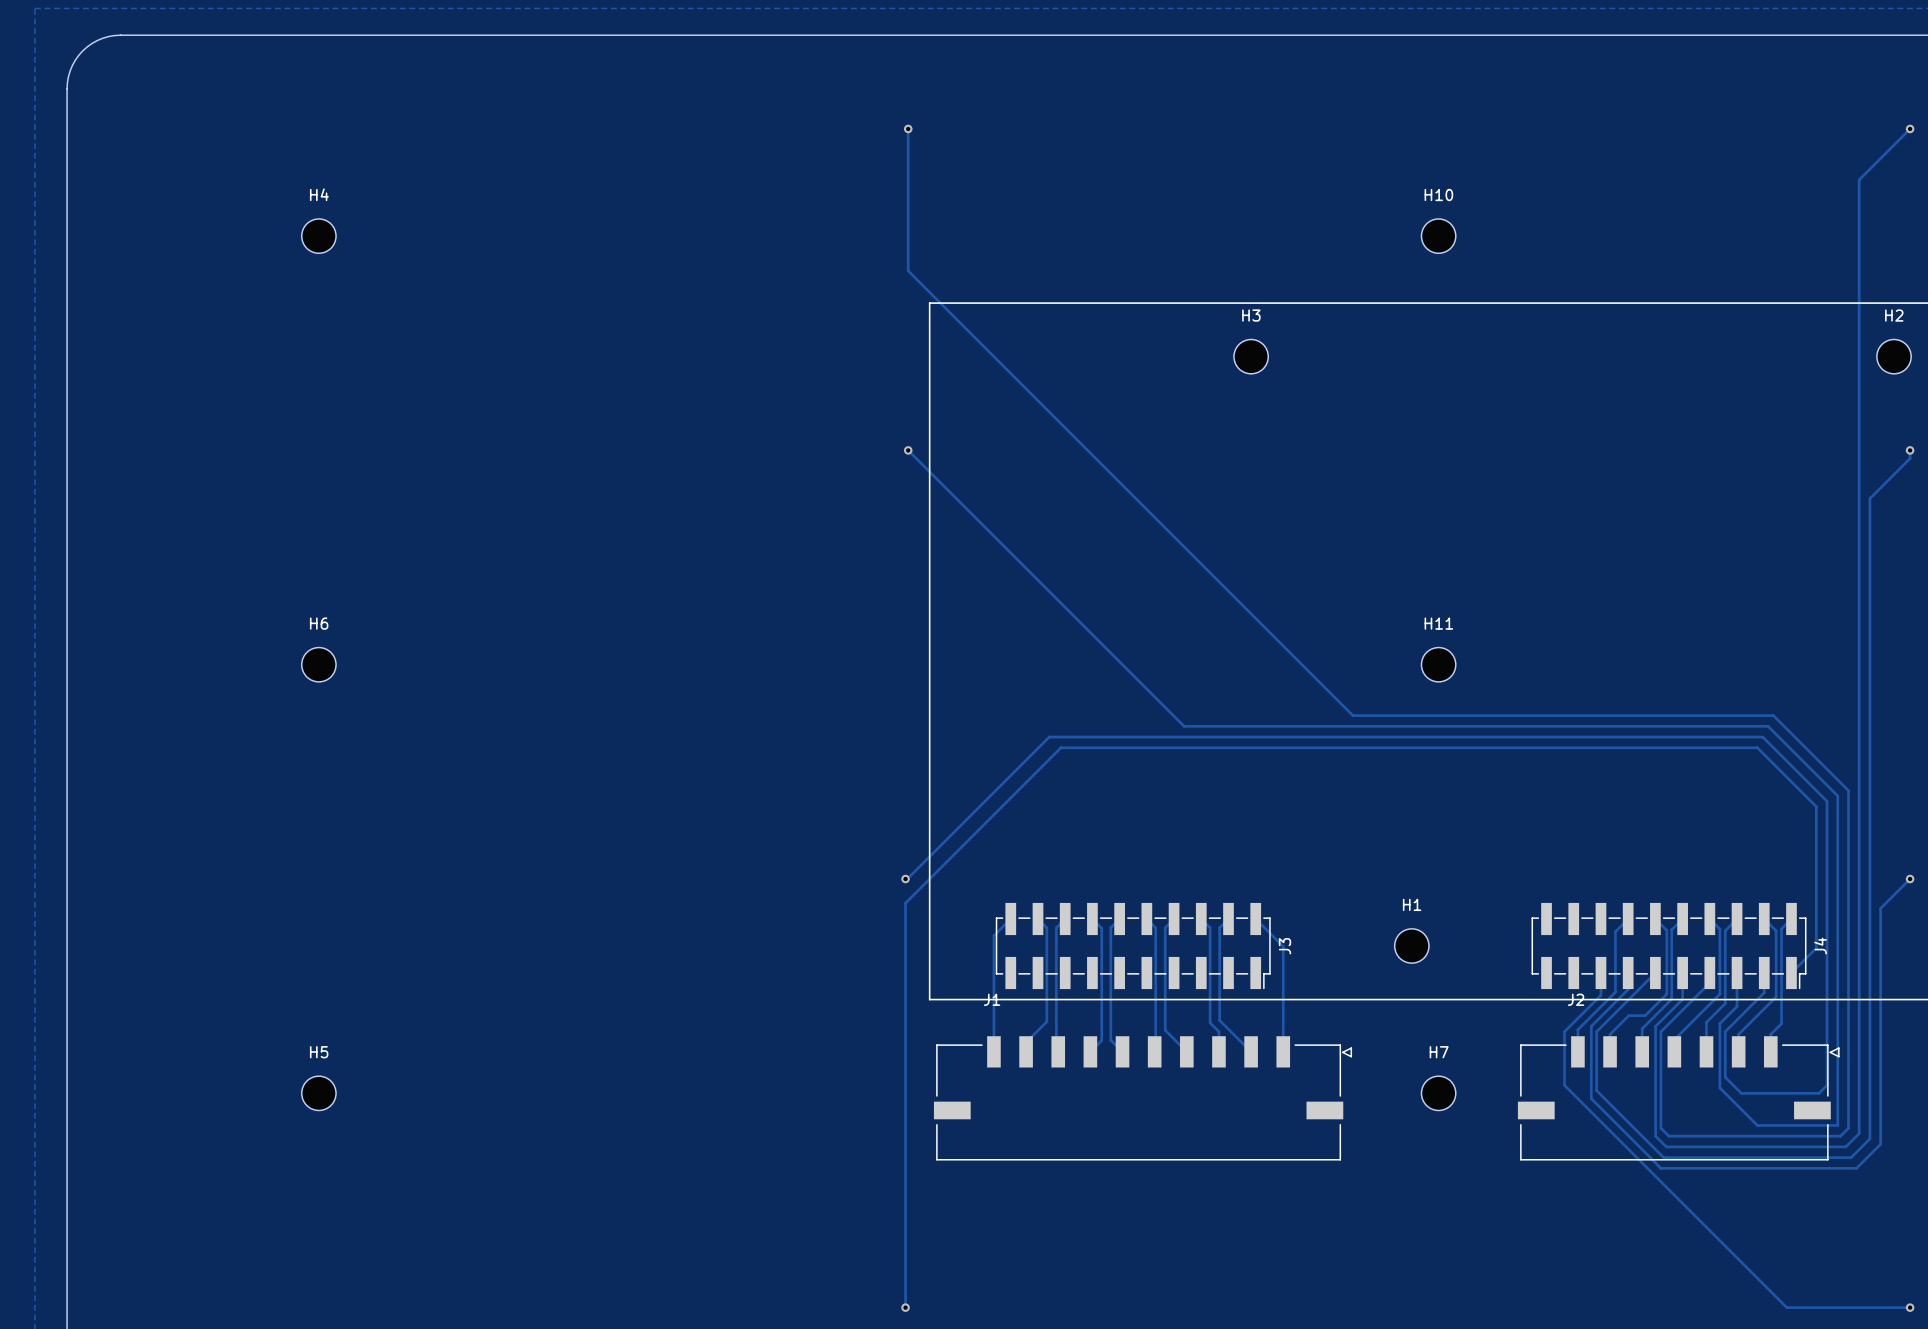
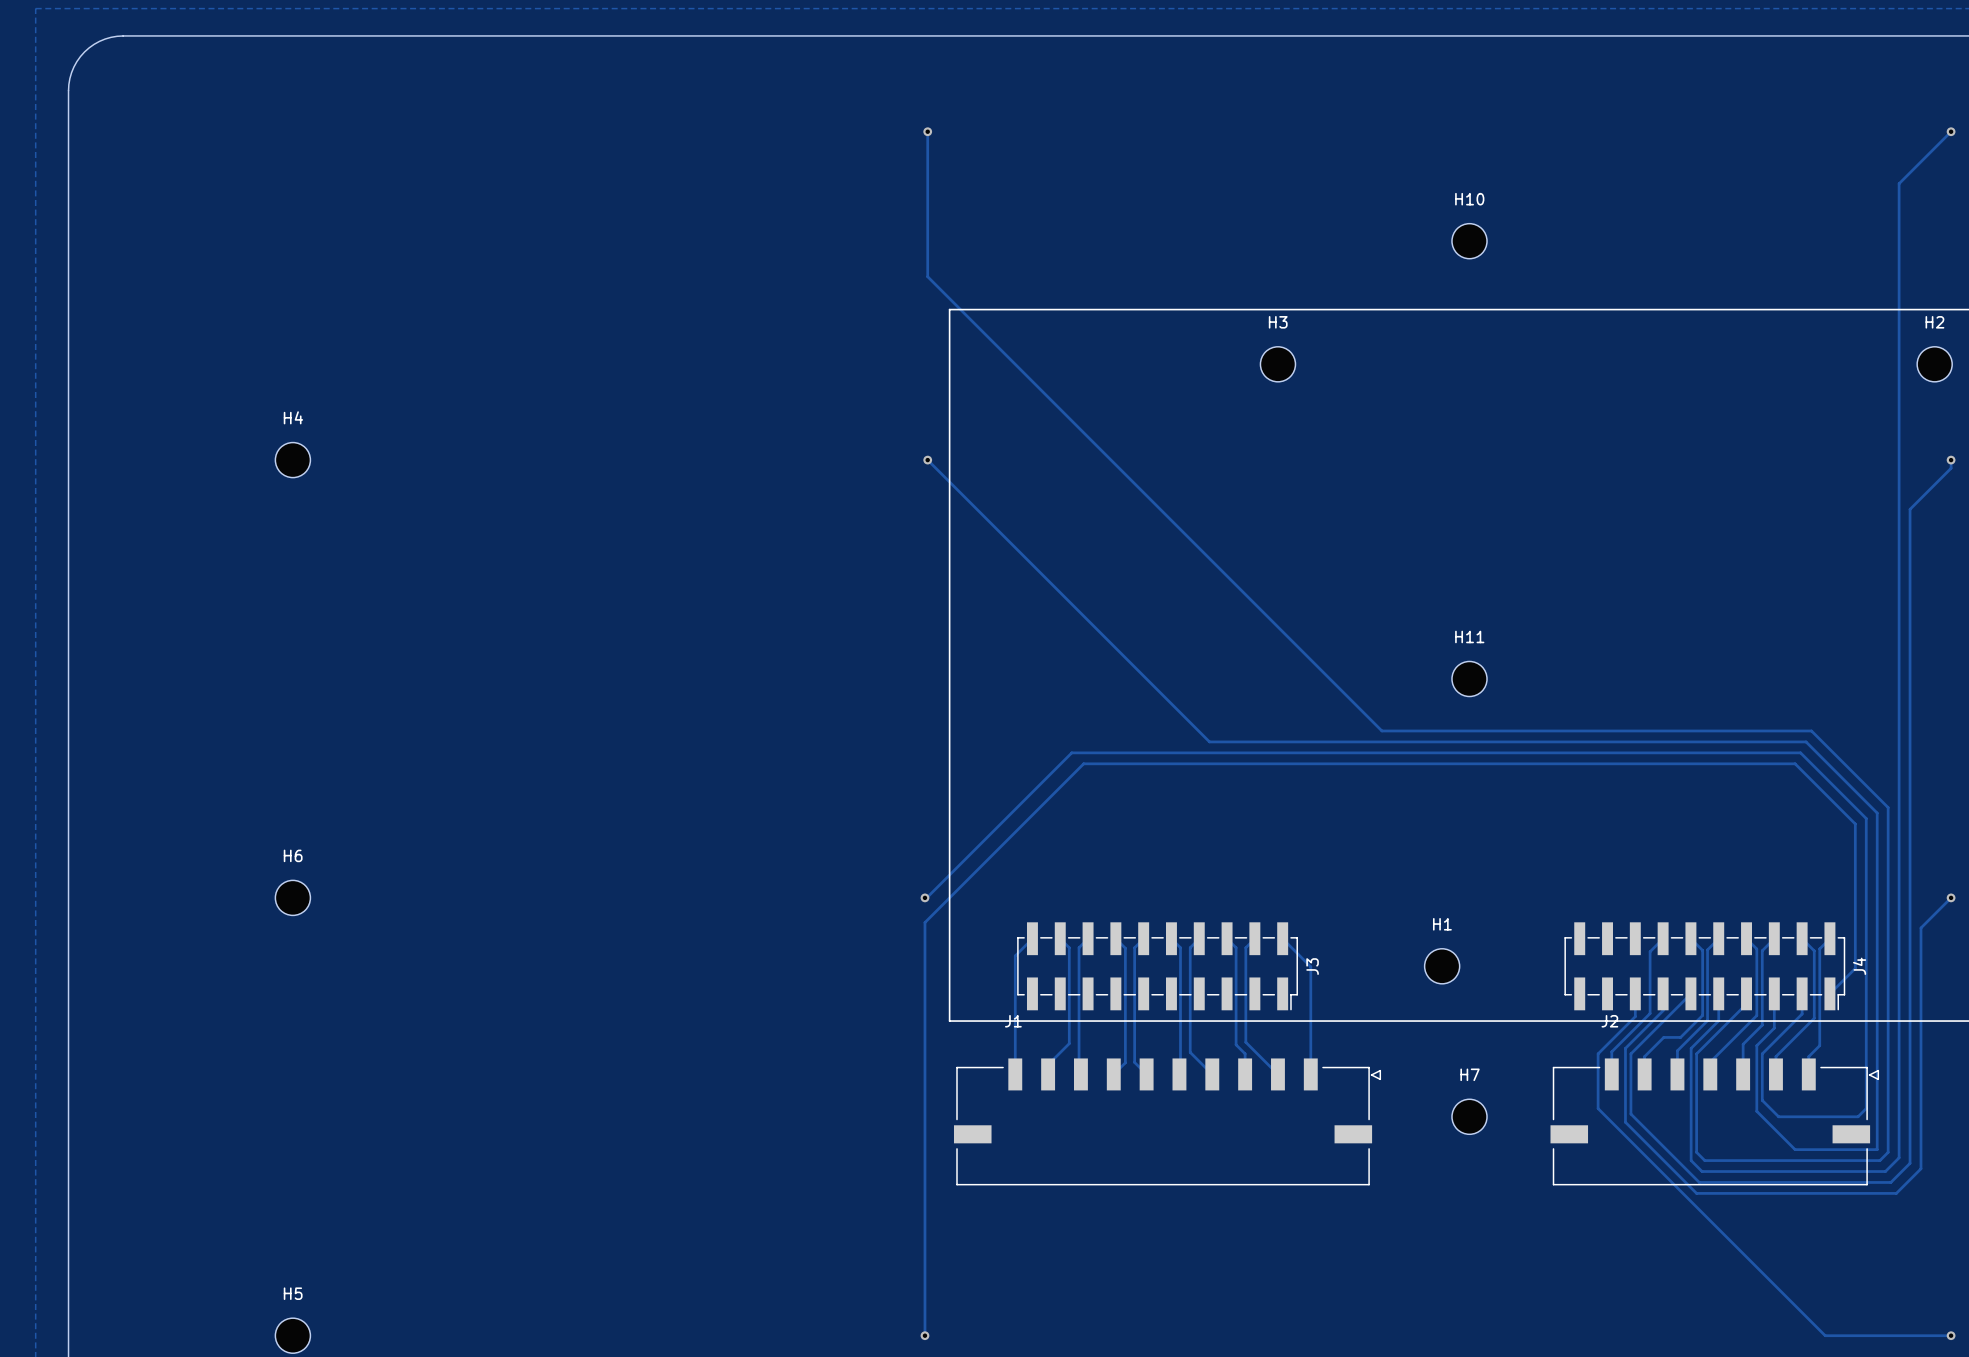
H4 position: (318, 236) -> (292, 460)
H6 position: (318, 664) -> (292, 897)
H5 position: (318, 1093) -> (292, 1335)

